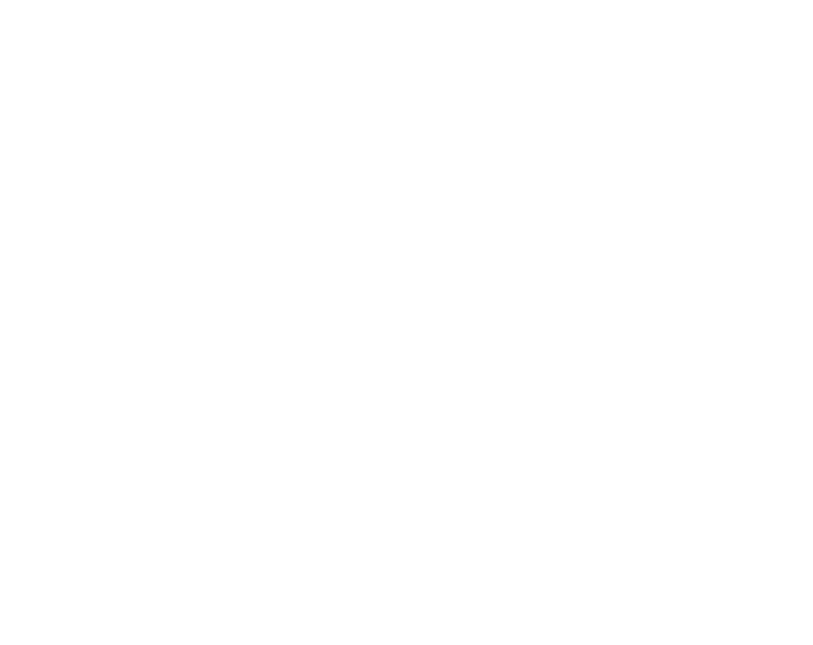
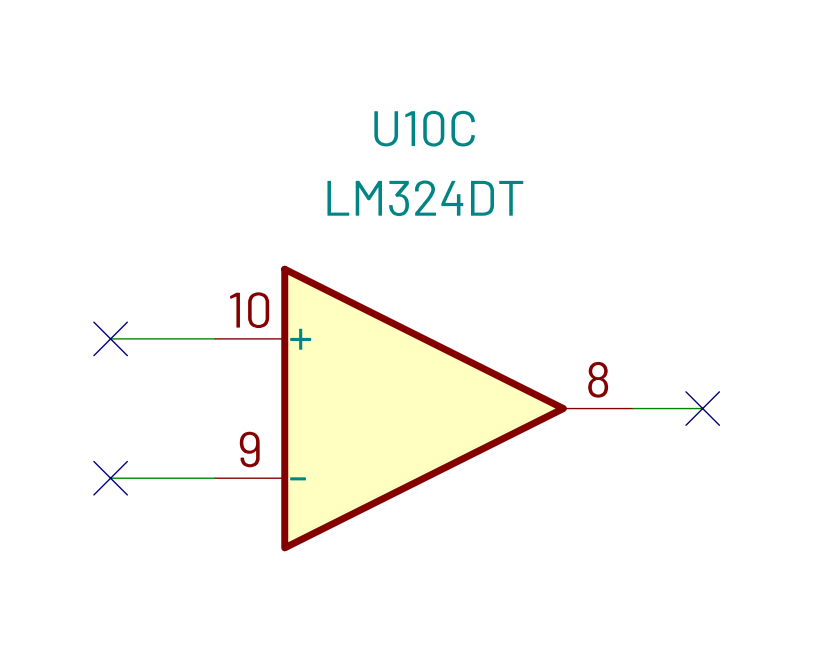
wire: none -> (110, 338) (215, 338)
no-connect mark: none -> (110, 338)
U10C: none -> LM324DT (424, 408)
wire: none -> (633, 408) (702, 408)
no-connect mark: none -> (702, 408)
wire: none -> (110, 478) (215, 478)
no-connect mark: none -> (110, 478)

